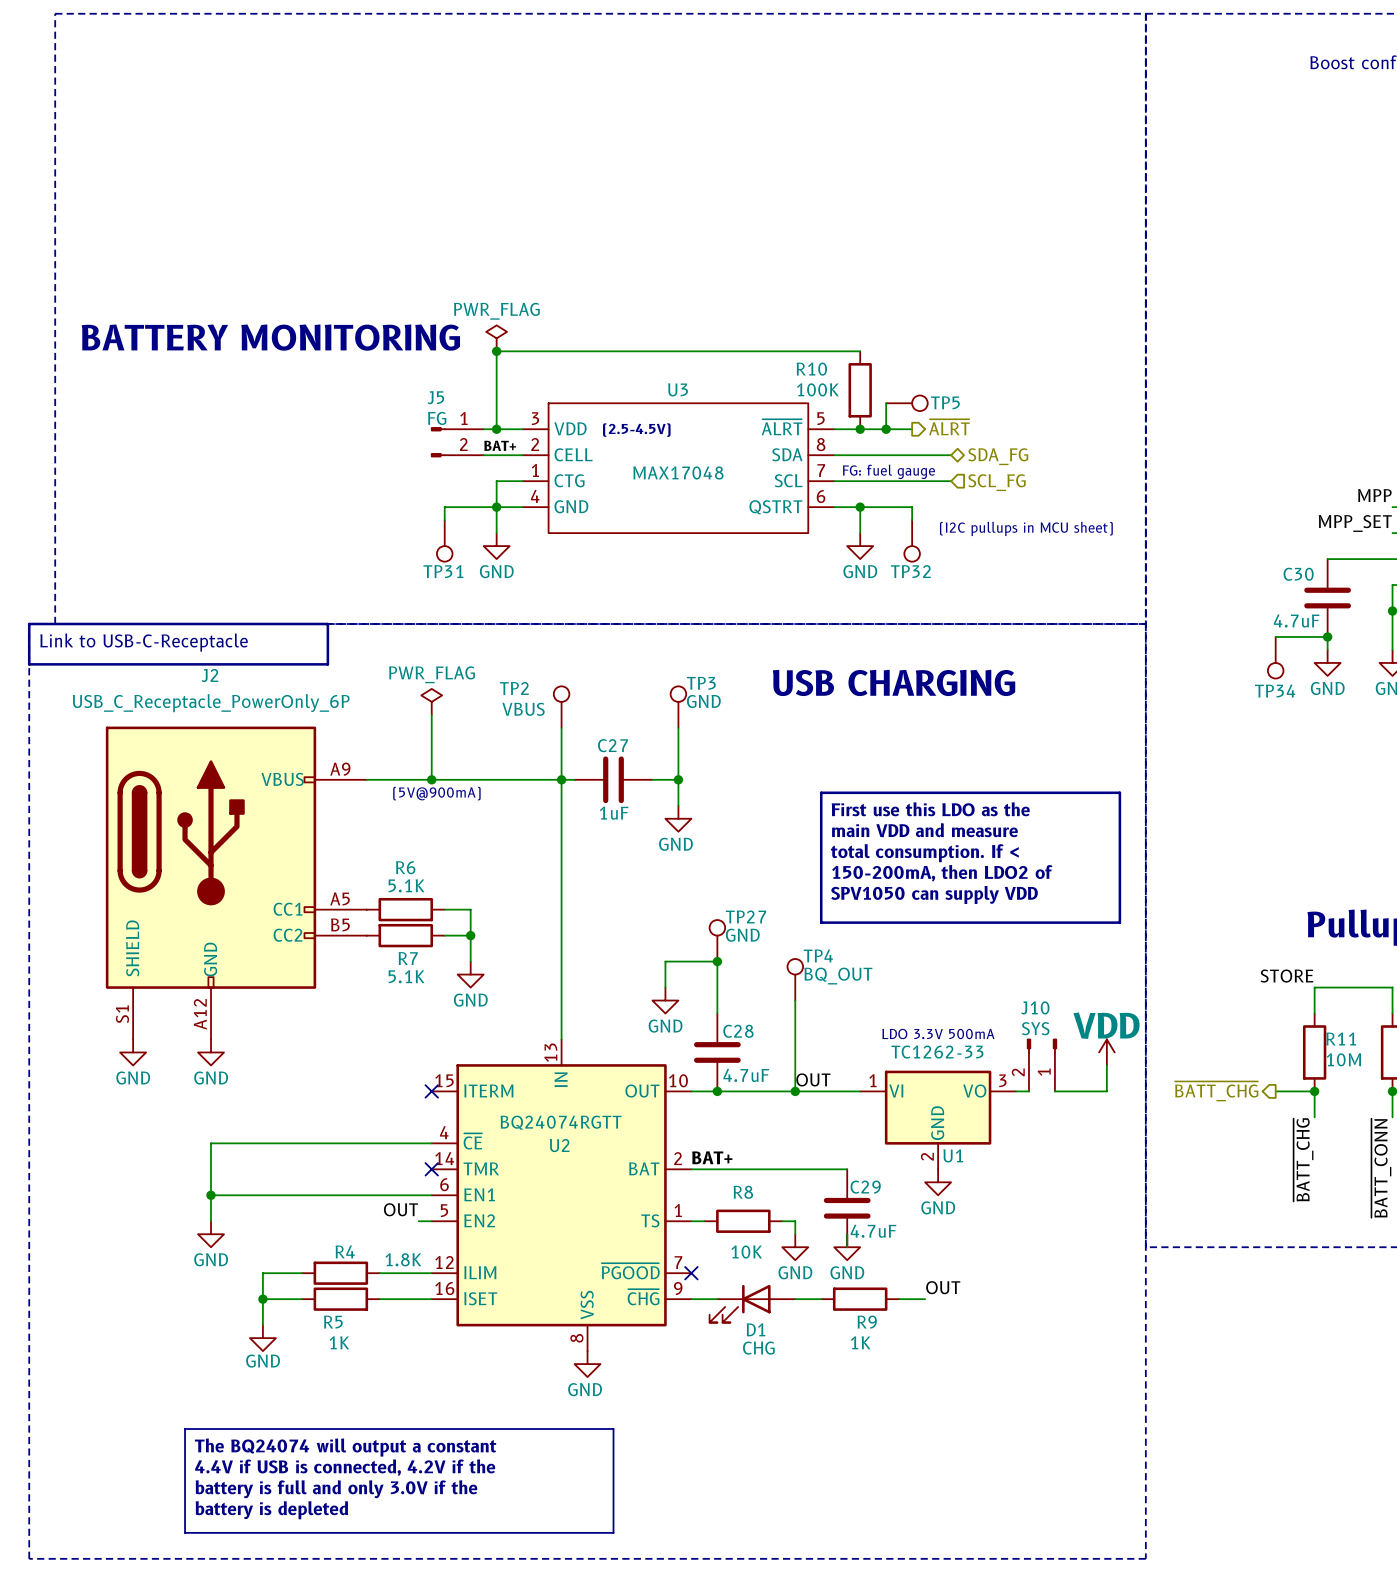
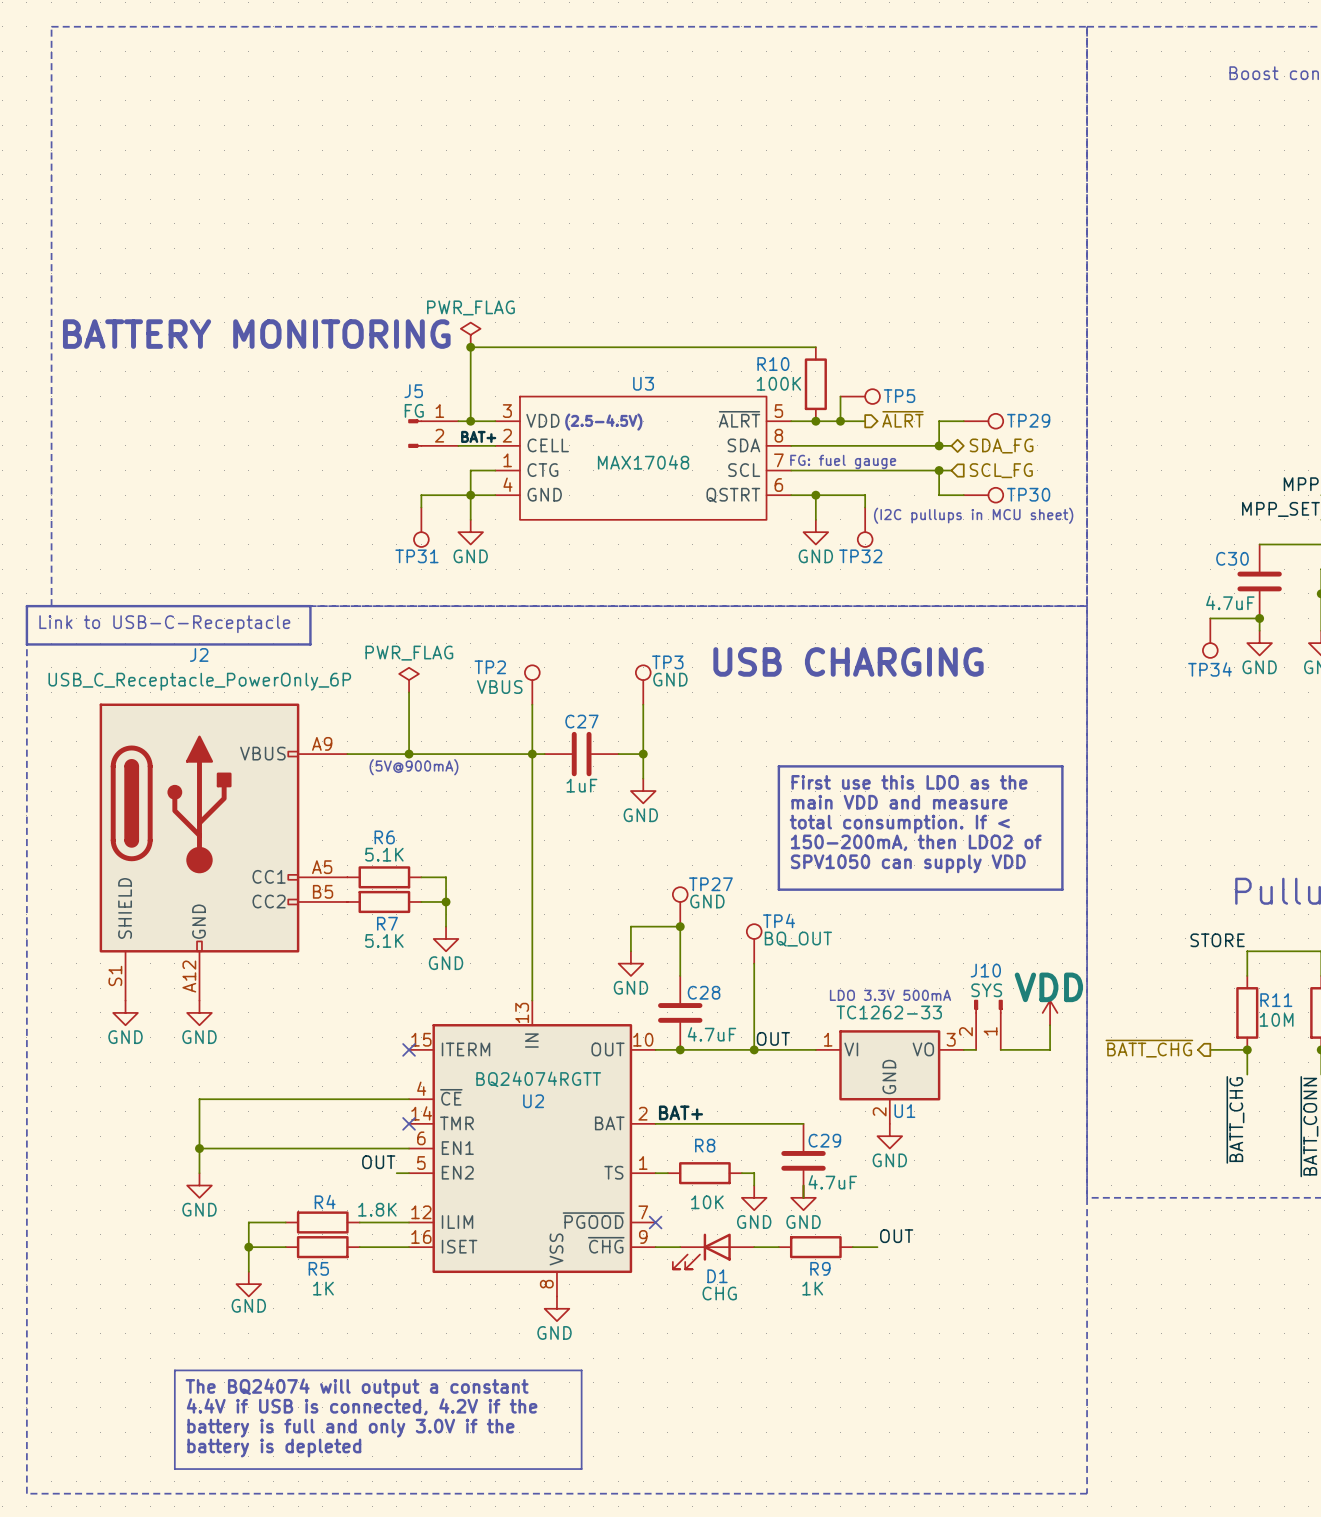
wire: none -> (963, 421) (939, 421) (939, 445)
TP29: none -> (983, 421)
wire: none -> (902, 445) (951, 445)
junction: none -> (939, 445)
hierarchical label position: SDA_FG (998, 456) -> SDA_FG (1001, 446)
wire: none -> (902, 470) (951, 470)
wire: none -> (939, 470) (939, 495) (963, 495)
junction: none -> (939, 470)
hierarchical label position: SCL_FG (996, 482) -> SCL_FG (1001, 470)
TP30: none -> (983, 495)

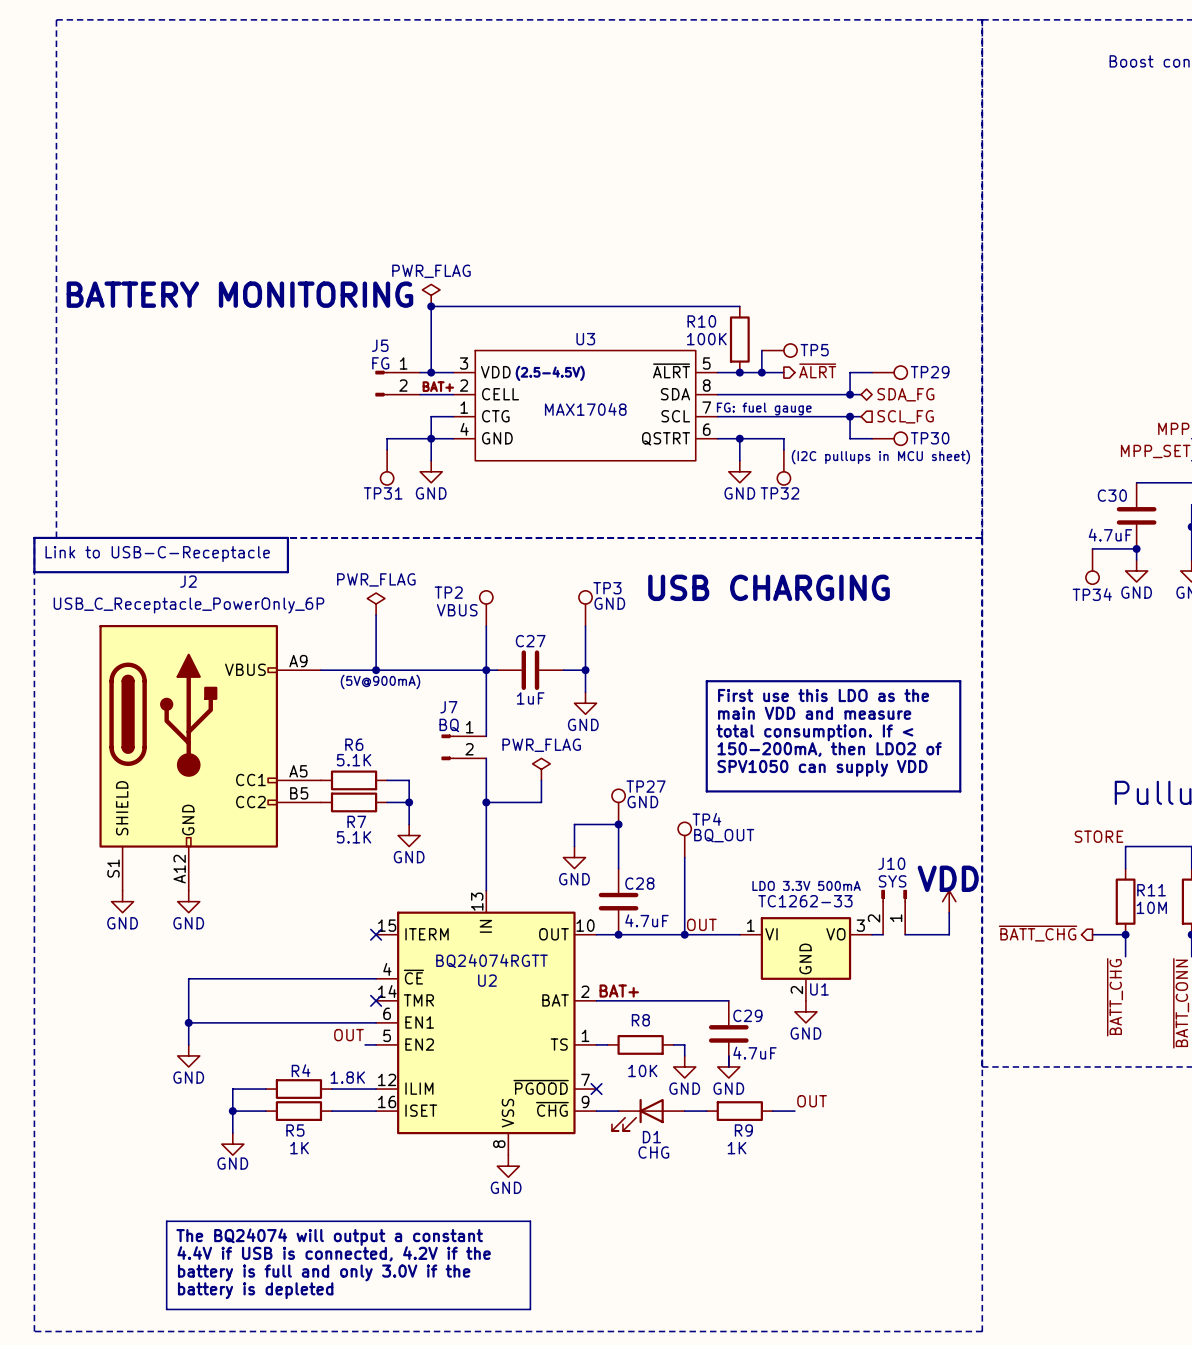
wire: (532, 828) (532, 852) -> none
J7: none -> BQ (463, 747)
power symbol: none -> PWR_FLAG (541, 769)
wire: none -> (541, 780) (541, 802) (486, 802)
junction: none -> (486, 802)

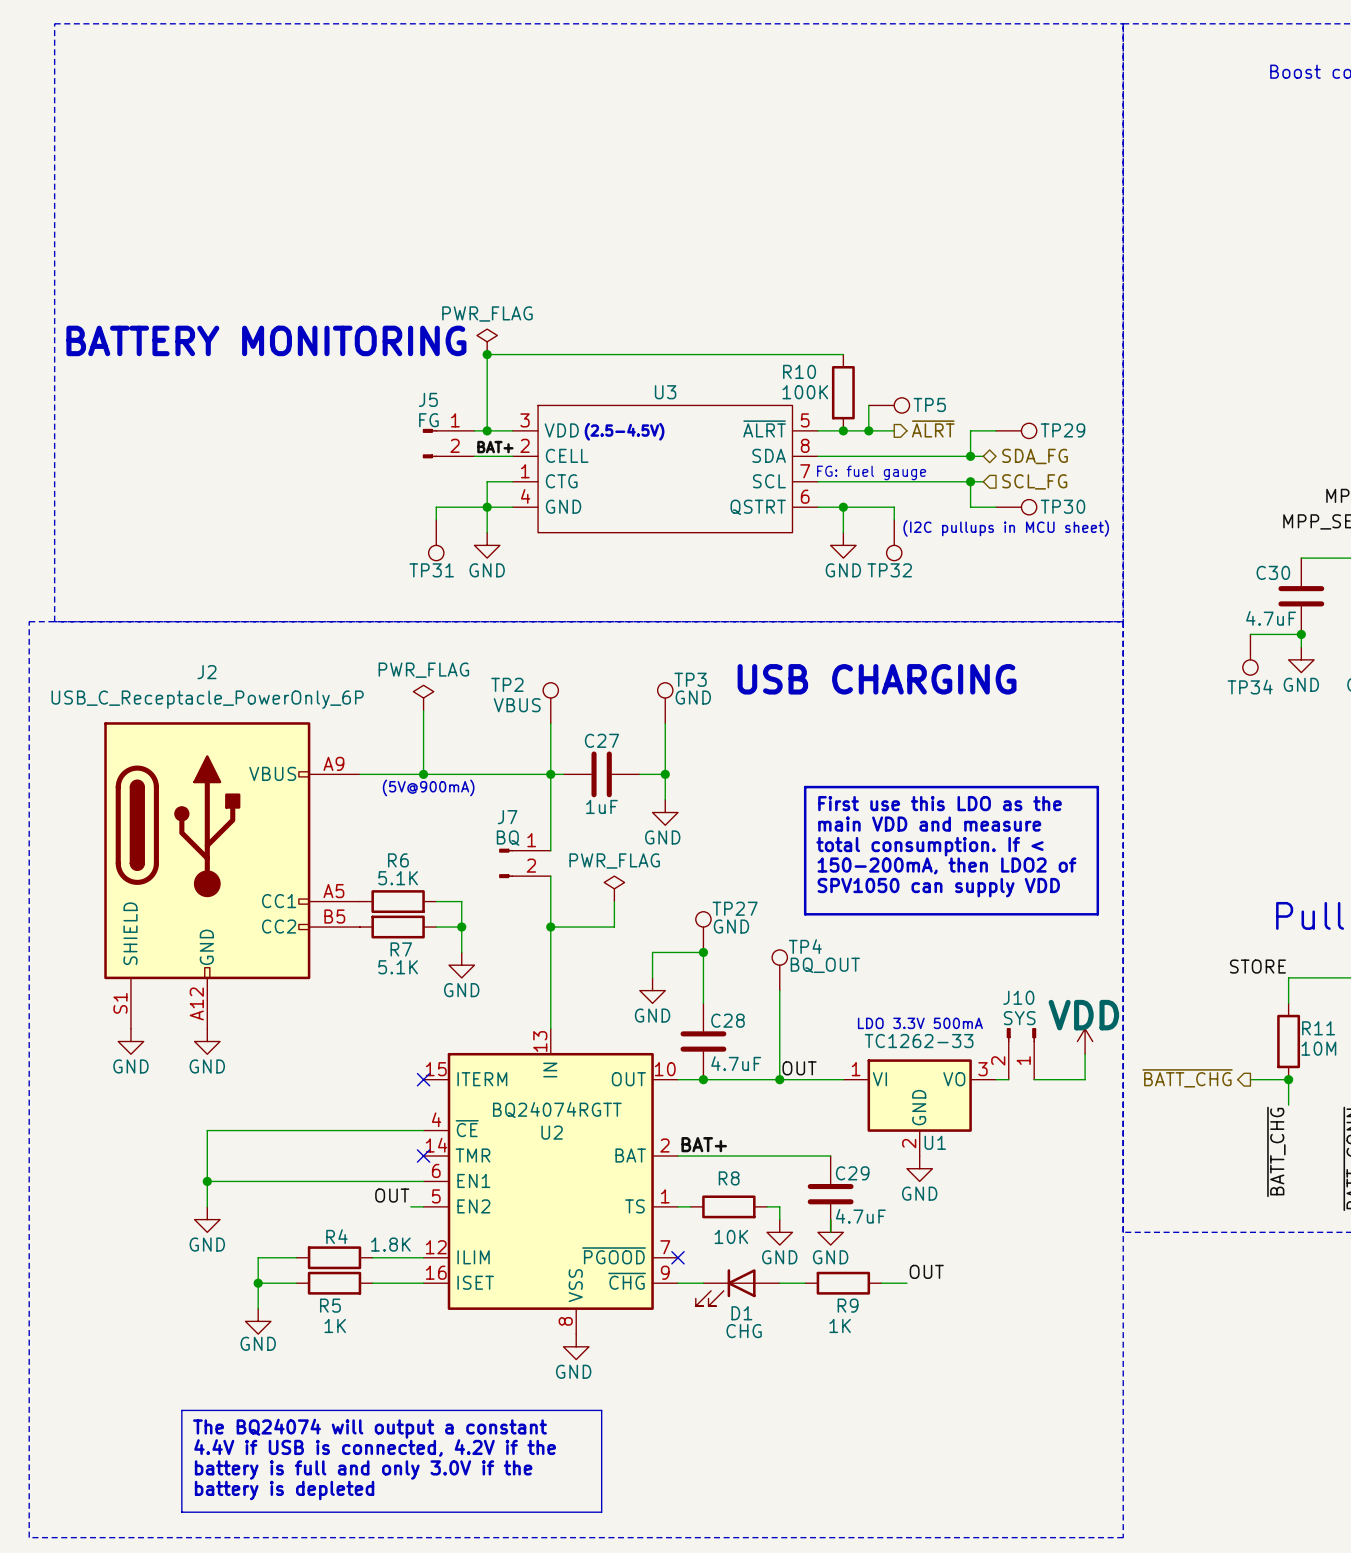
U3 value: MAX17048 (585, 409) -> none
line: (34, 537) (287, 537) (287, 572) (34, 572) (34, 537) -> none
text: Link to USB-C-Receptacle (157, 554) -> none

